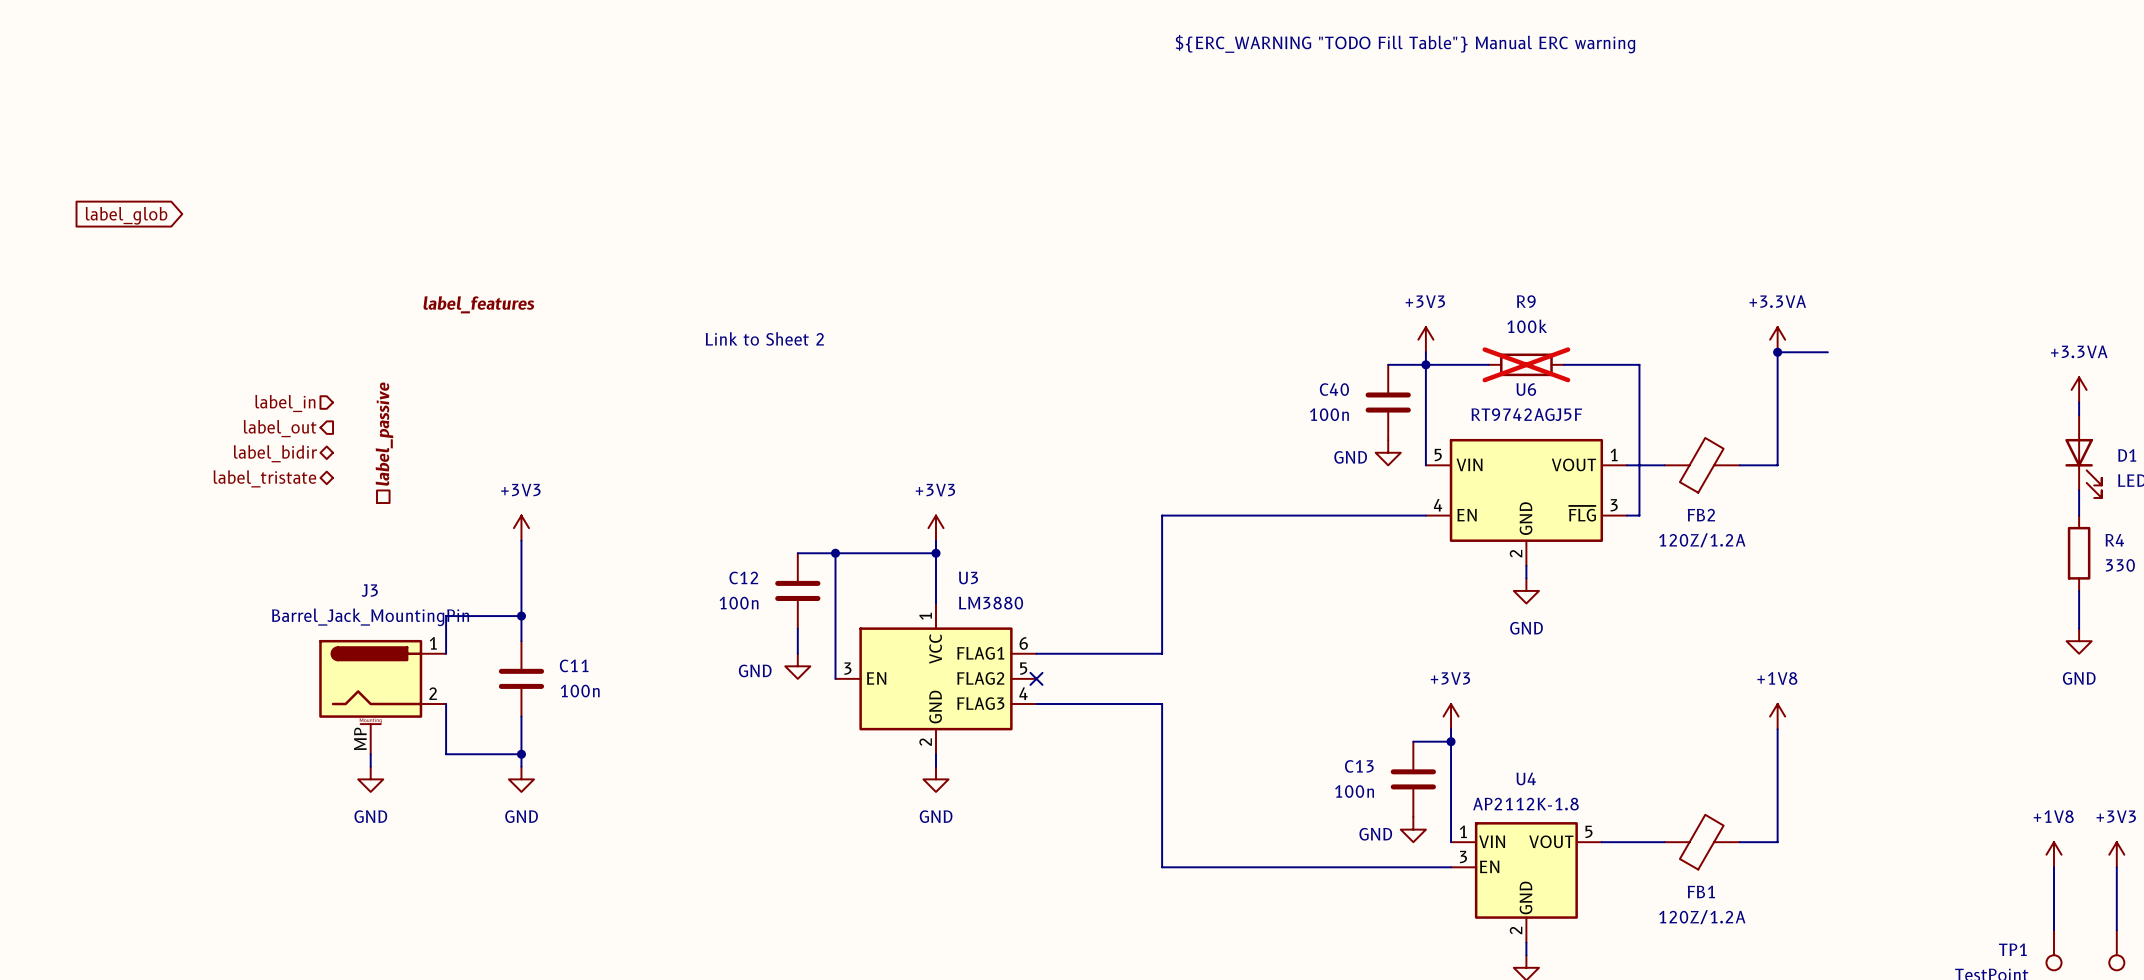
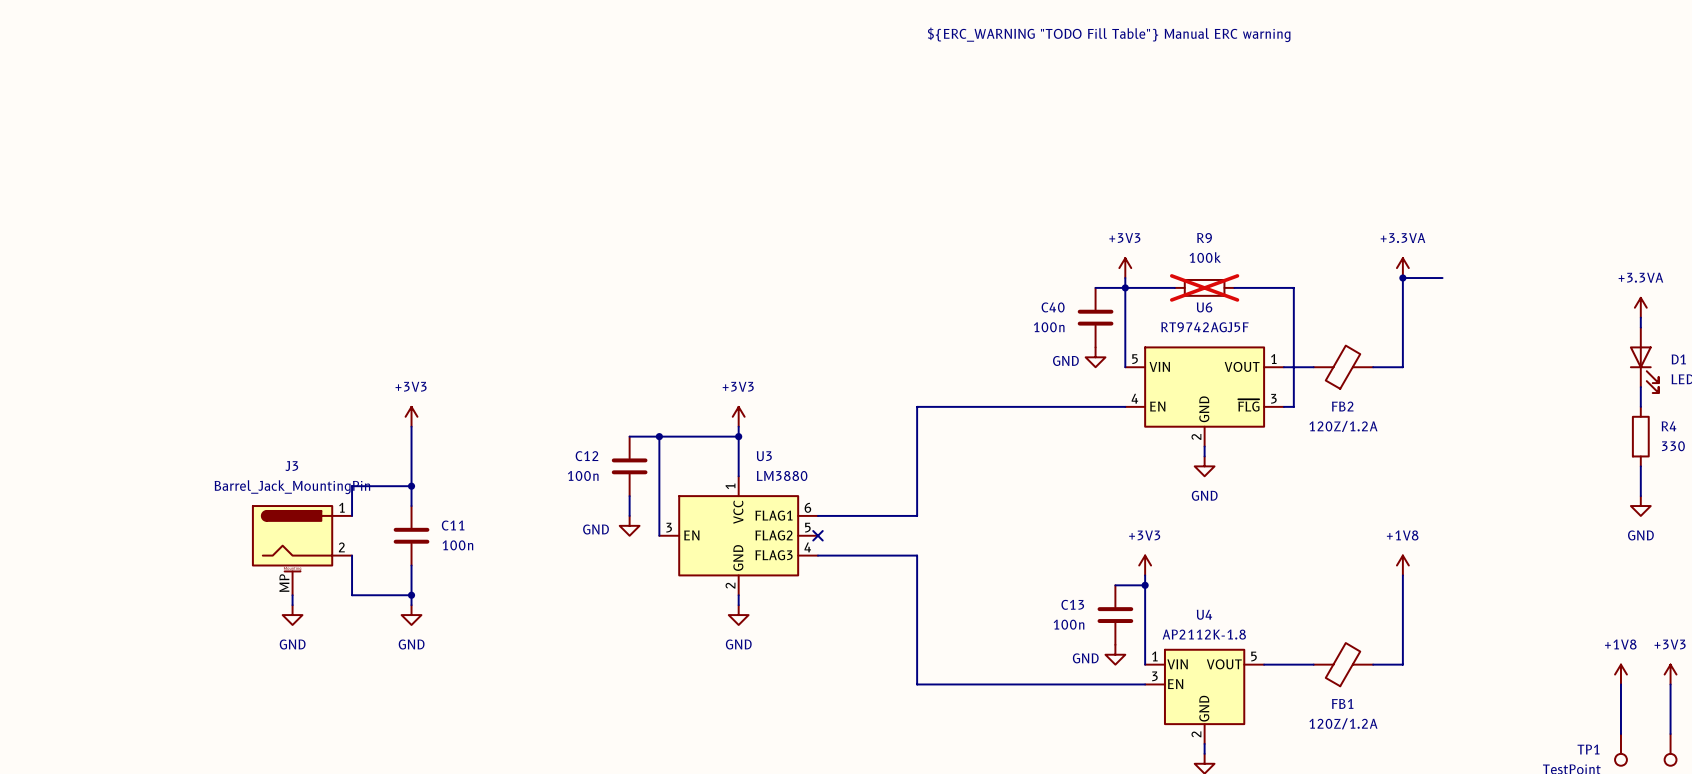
global label: label_glob (126, 215) -> none
label: label_features (478, 304) -> none
text: Link to Sheet 2 (764, 338) -> none
hierarchical label: label_in (285, 403) -> none
hierarchical label: label_out (280, 428) -> none
hierarchical label: label_passive (384, 434) -> none
hierarchical label: label_bidir (275, 453) -> none
hierarchical label: label_tristate (264, 478) -> none

